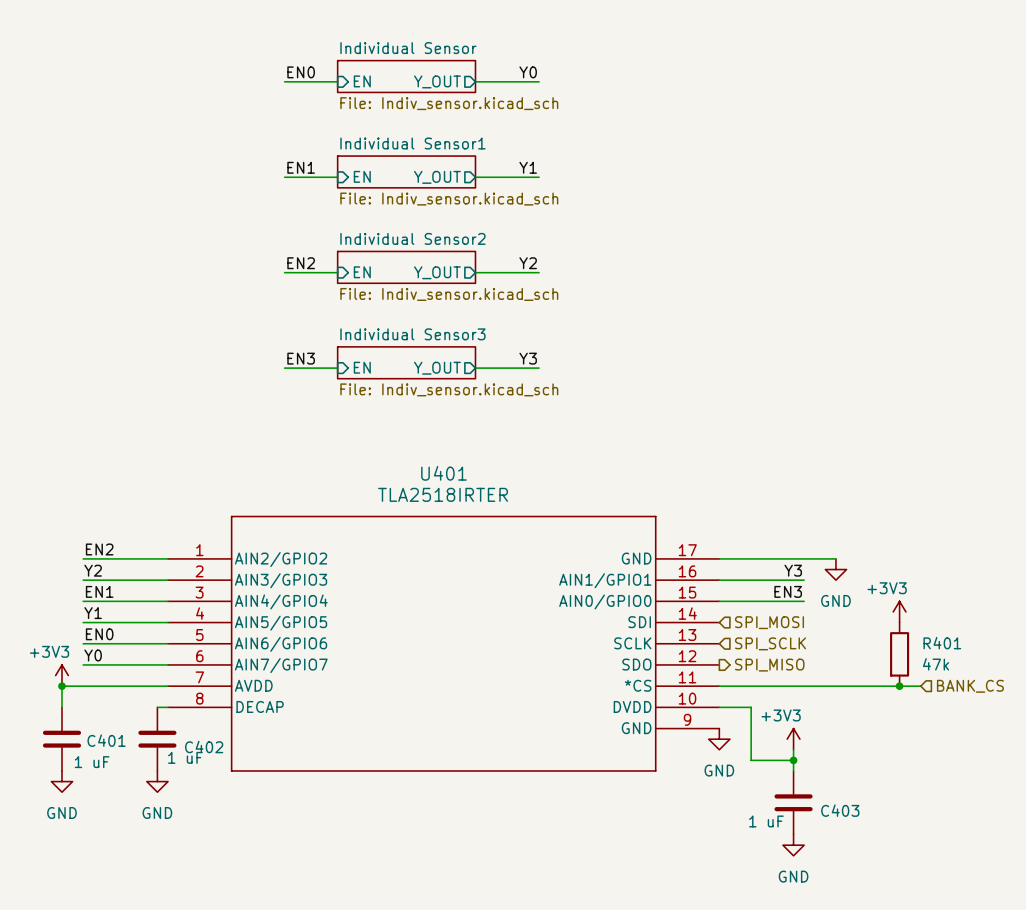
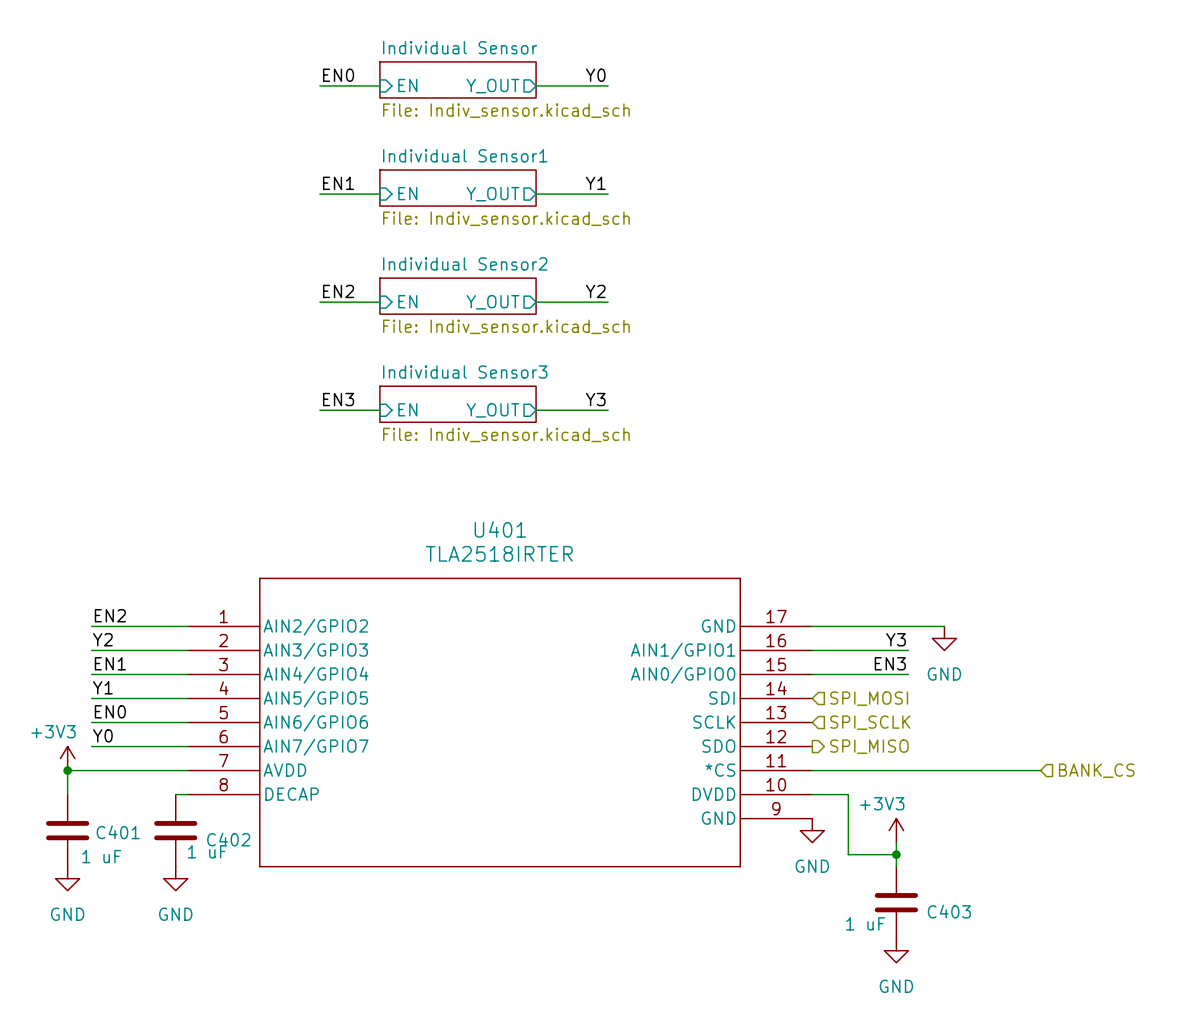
power symbol: +3V3 (899, 611) -> none
R401: 47k (899, 654) -> none
junction: (899, 686) -> none

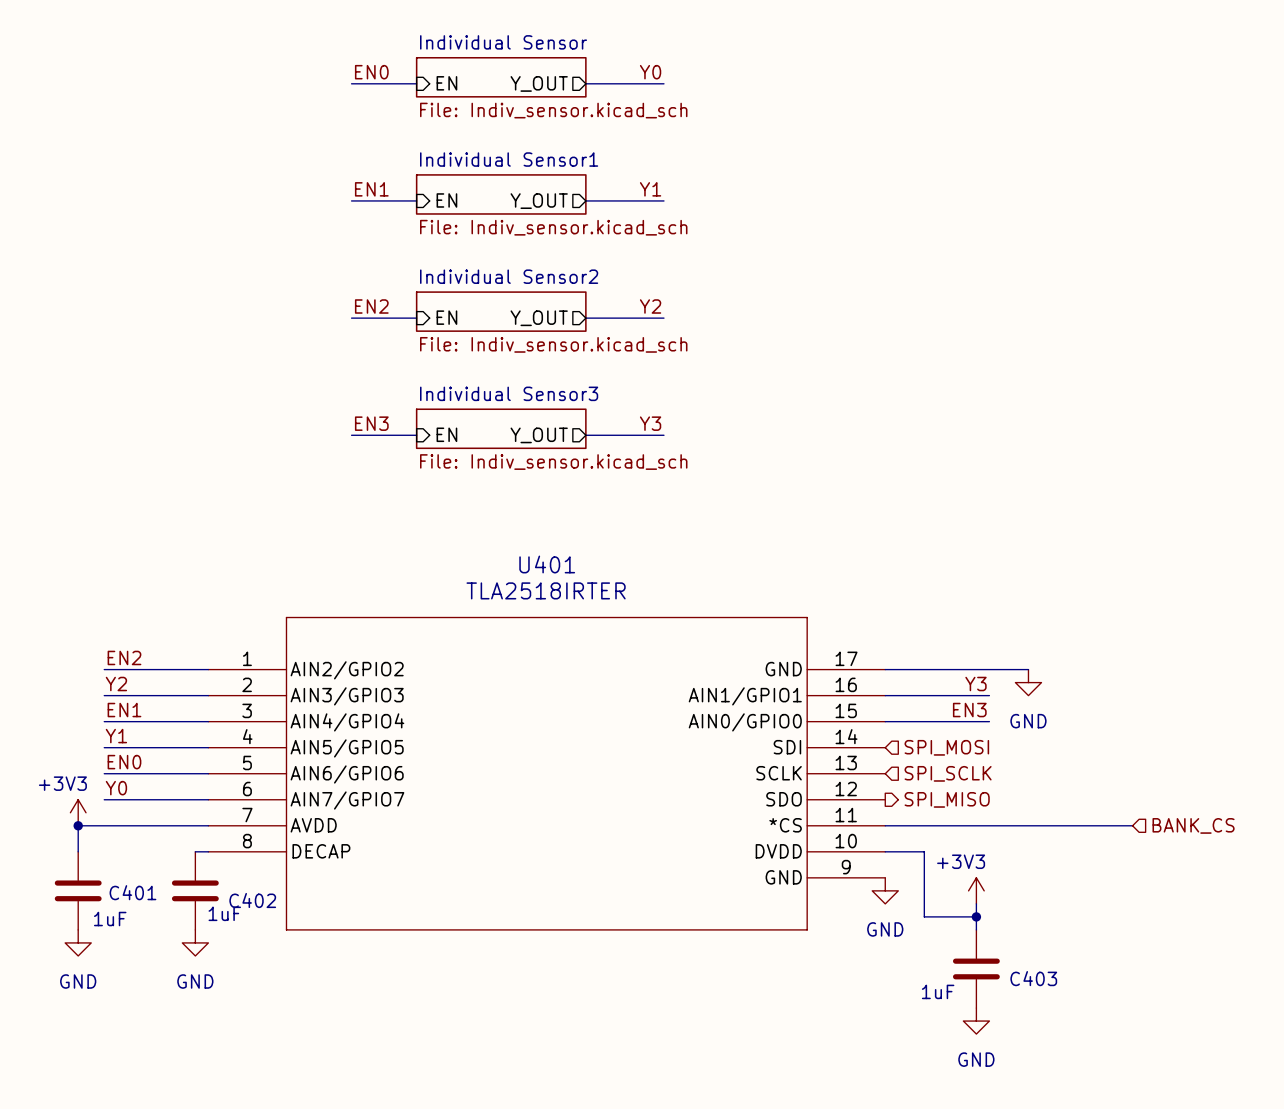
C402 value: 1 uF (207, 851) -> 1uF (224, 913)
C401 value: 1 uF (101, 856) -> 1uF (110, 919)
C403 value: 1 uF (865, 923) -> 1uF (938, 991)

